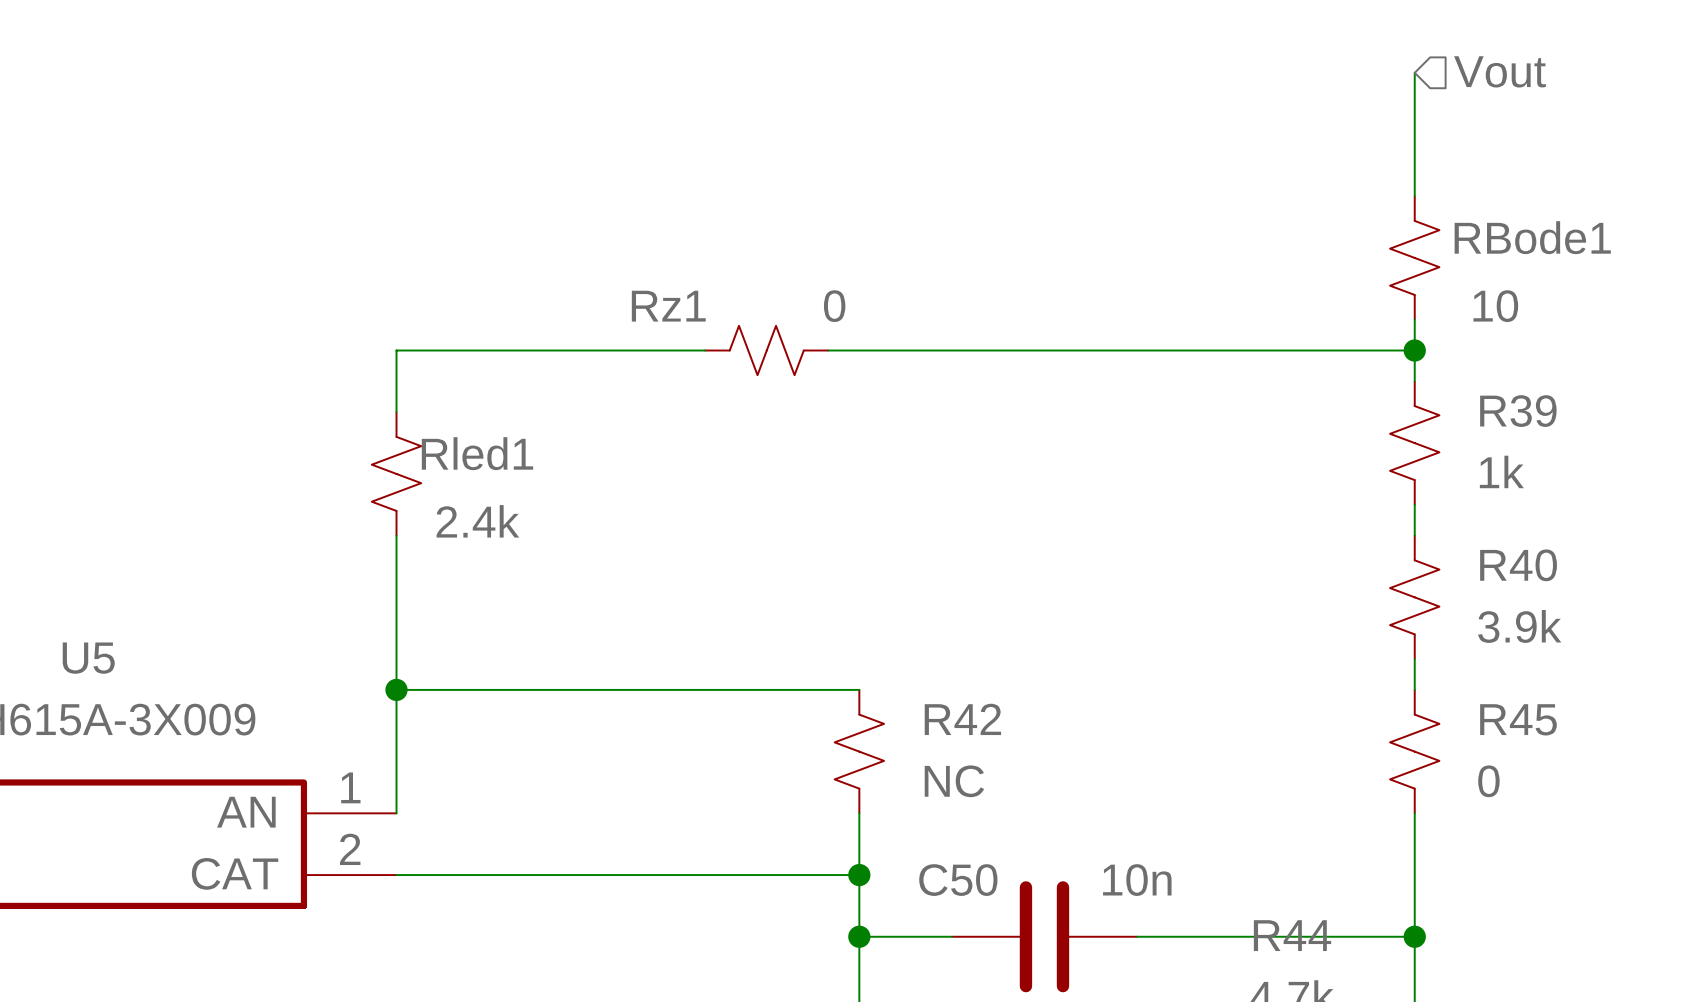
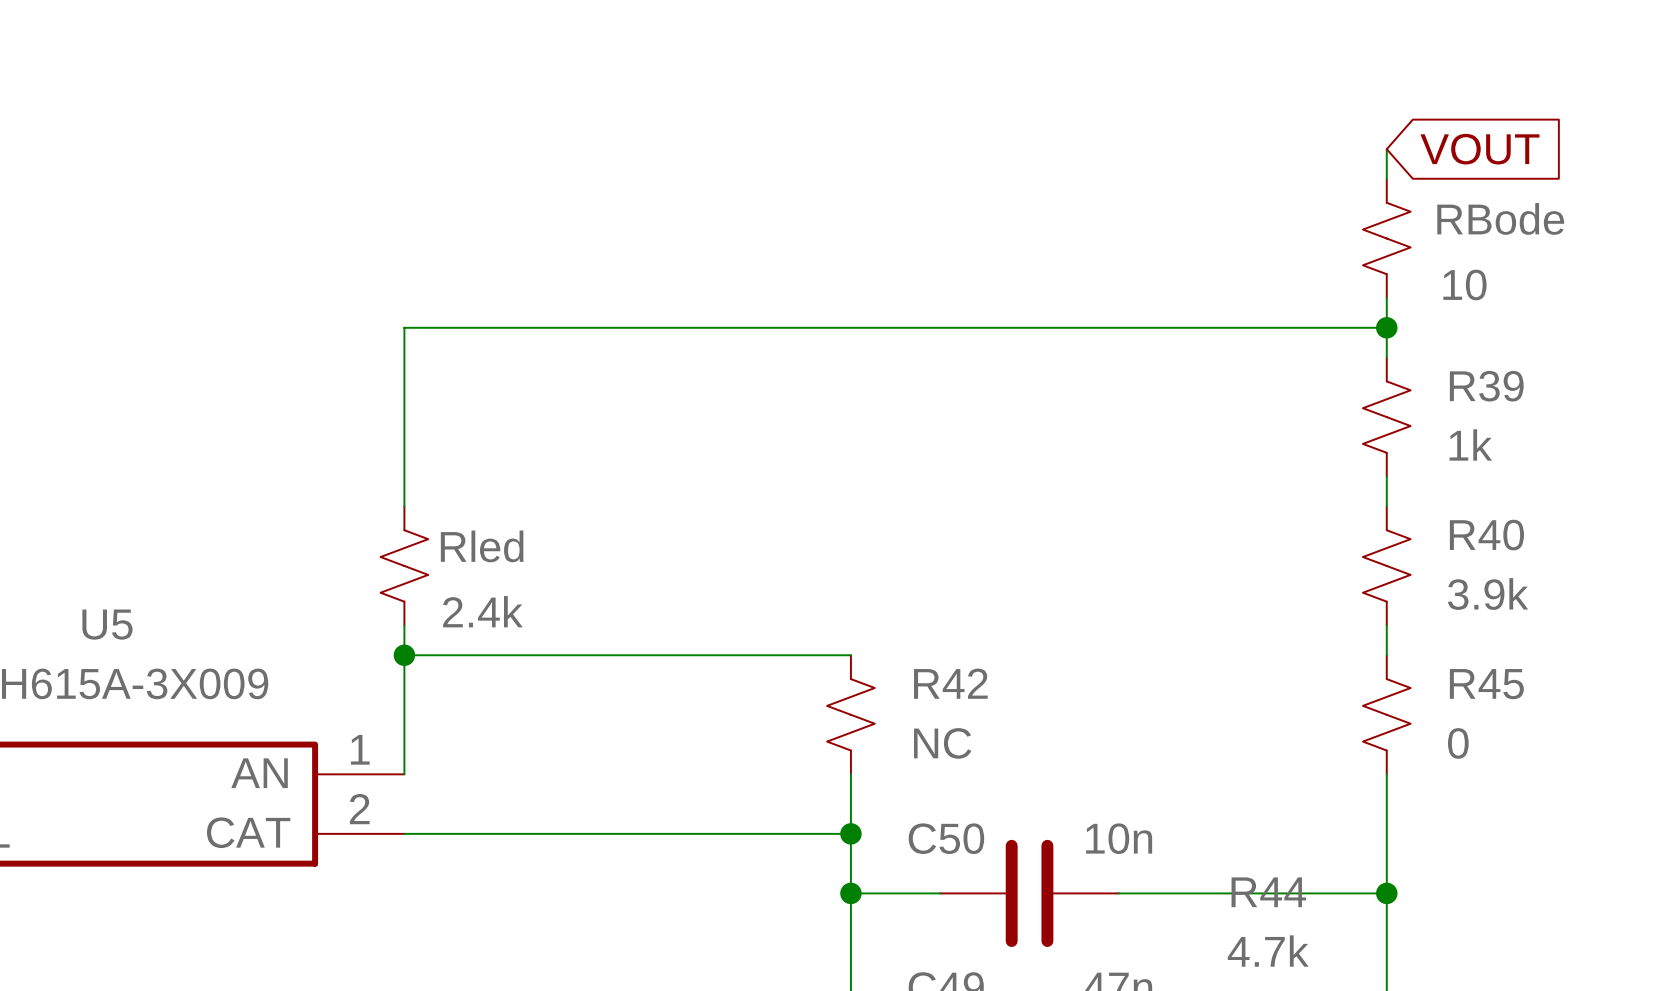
hierarchical label: Vout (1499, 71) -> none
wire: (1414, 72) (1414, 165) -> none
global label: none -> VOUT (1479, 149)
RBode1 name: RBode1 (1532, 237) -> RBode (1500, 218)
wire: none -> (702, 327) (821, 327)
Rz1: 0 (766, 350) -> none
Rled1: 2.4k (396, 473) -> none
wire: (396, 535) (396, 659) -> (404, 506) (404, 387)
Rled: none -> 2.4k (404, 565)

